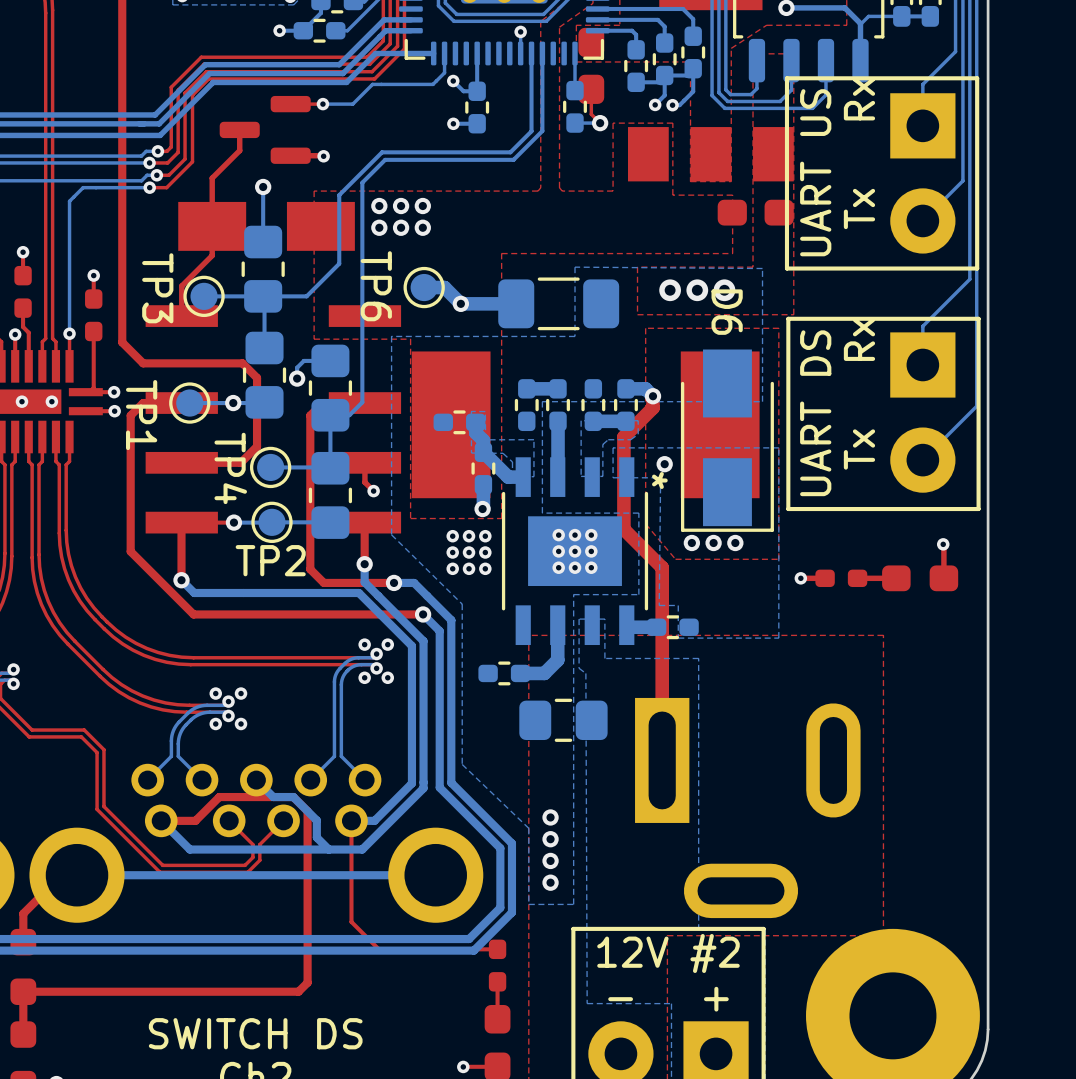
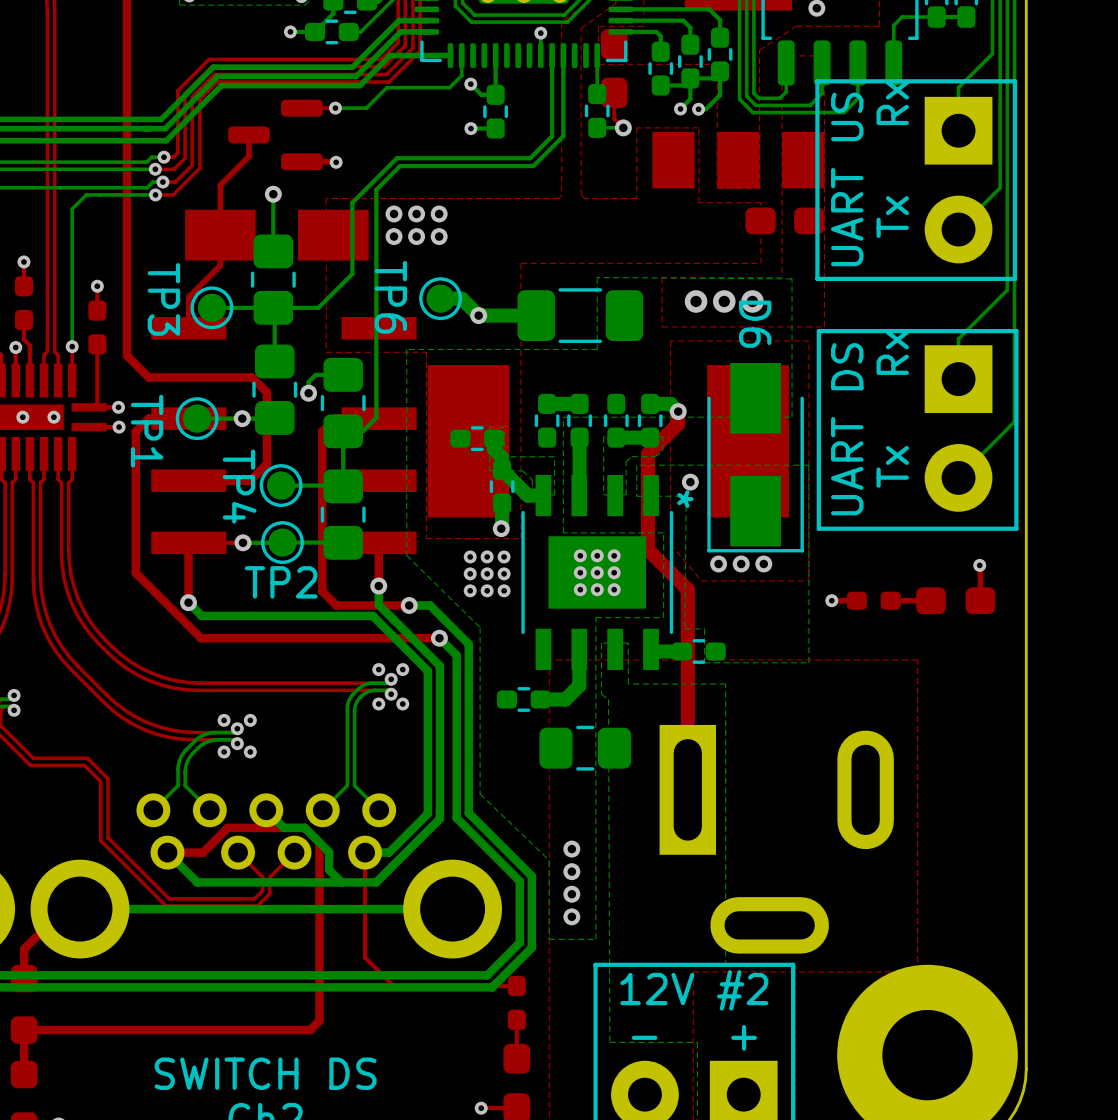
bottom track: (786, 7) (844, 7) (860, 23) (860, 60) -> none
top track: (364, 462) (364, 482) (373, 491) -> none
via: (373, 491) -> none

